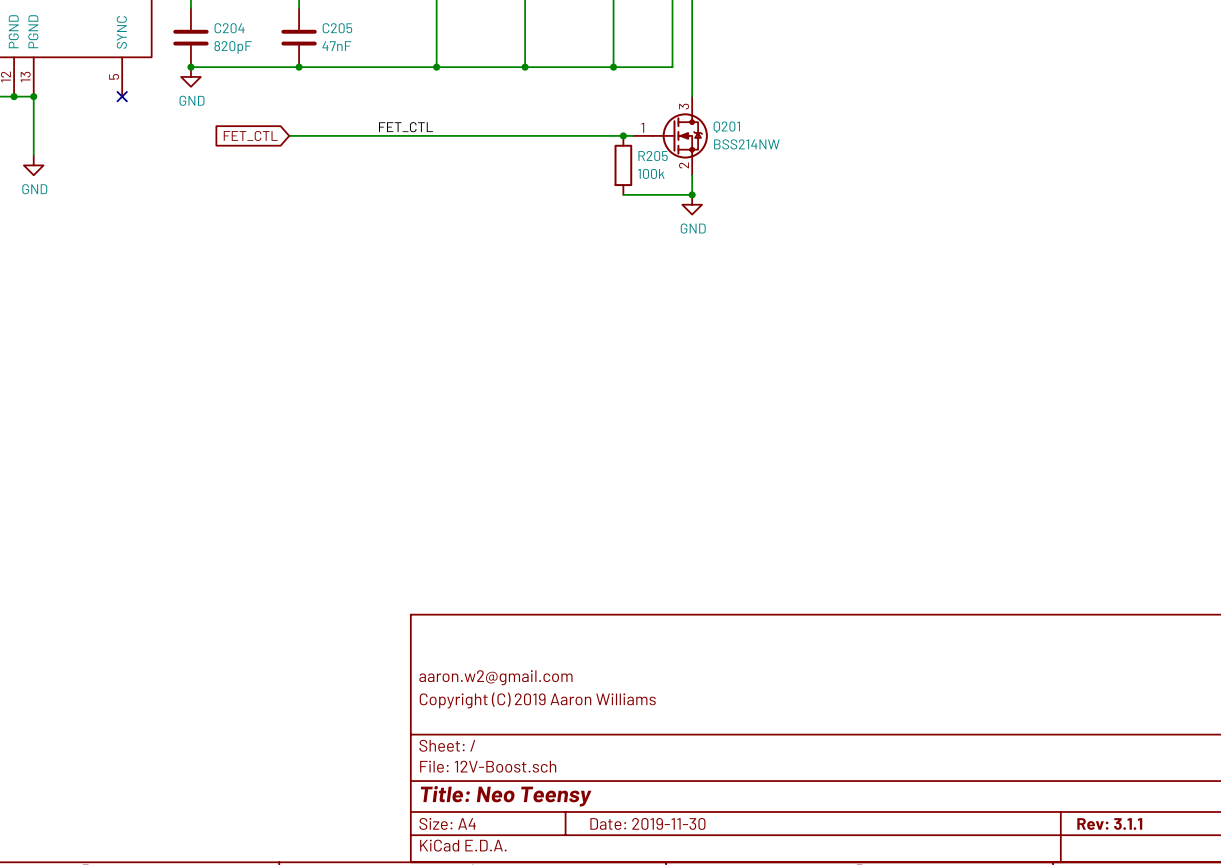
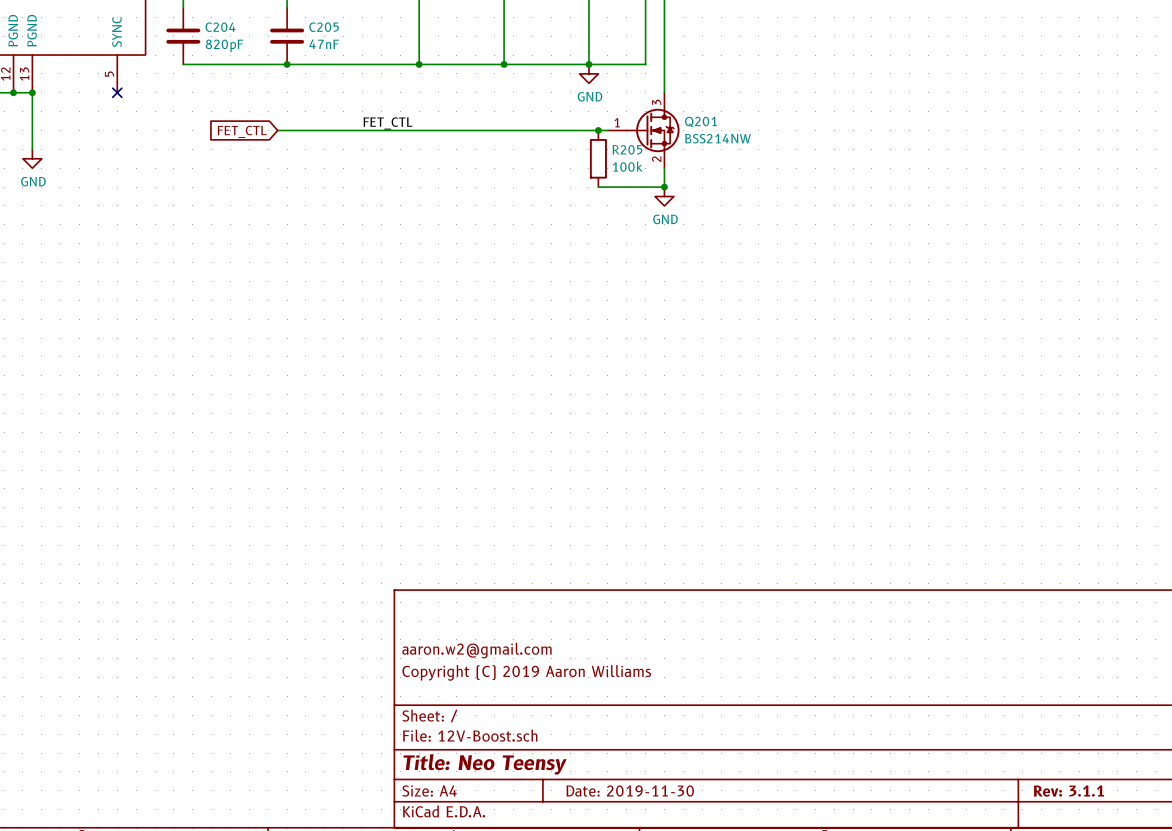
junction: (190, 67) -> none
power symbol: GND (190, 76) -> none
power symbol: none -> GND (588, 73)

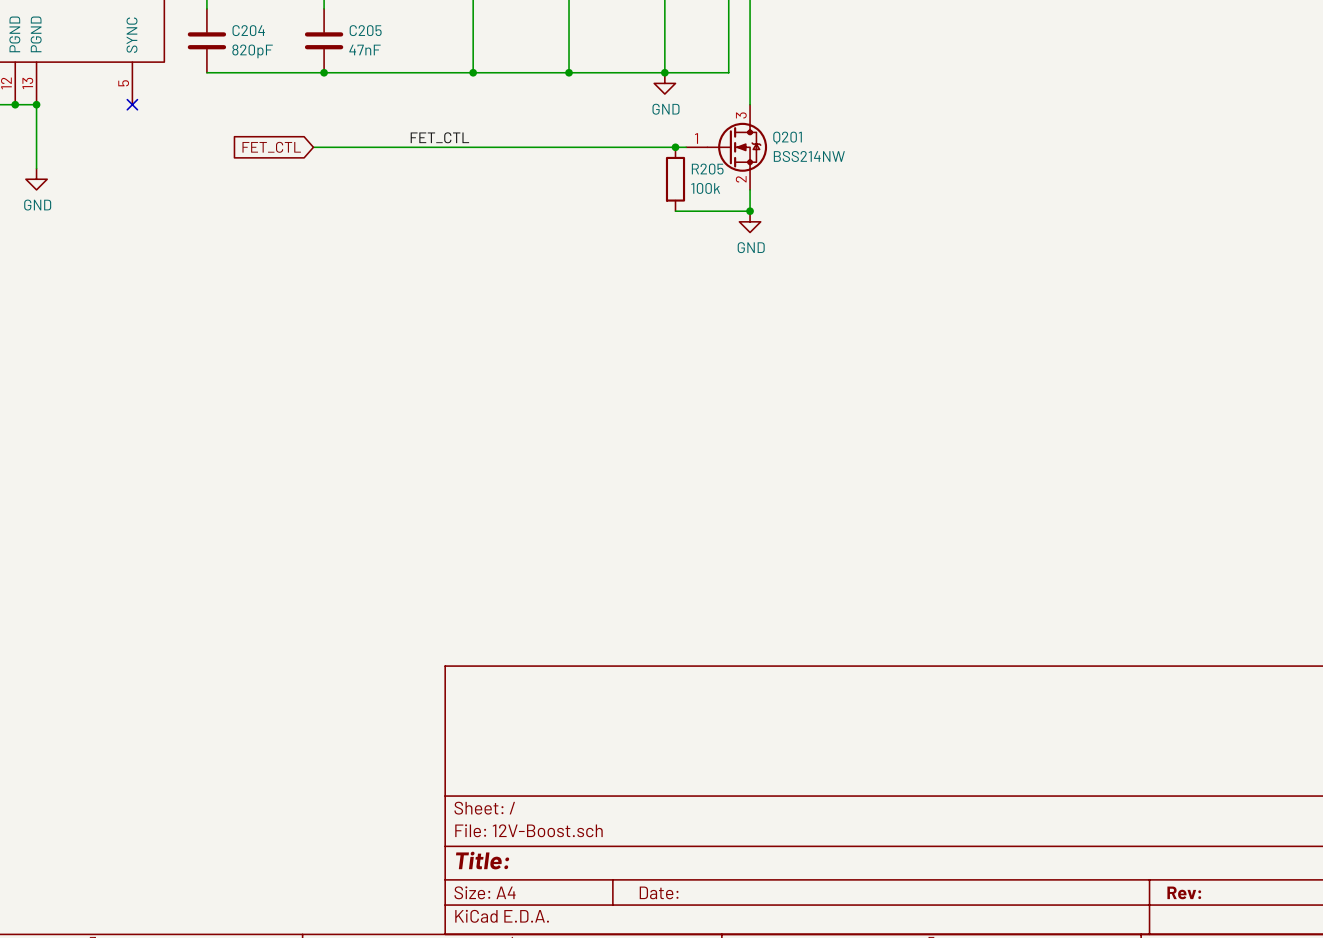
title block: aaron.w2@gmail.com (476, 650) -> none
title block: Copyright (C) 2019 Aaron Williams (526, 672) -> none
title block: Title: Neo Teensy (485, 764) -> Title: (482, 860)
title block: Date: 2019-11-30 (630, 791) -> Date: (659, 892)
title block: Rev: 3.1.1 (1068, 791) -> Rev: (1184, 892)

